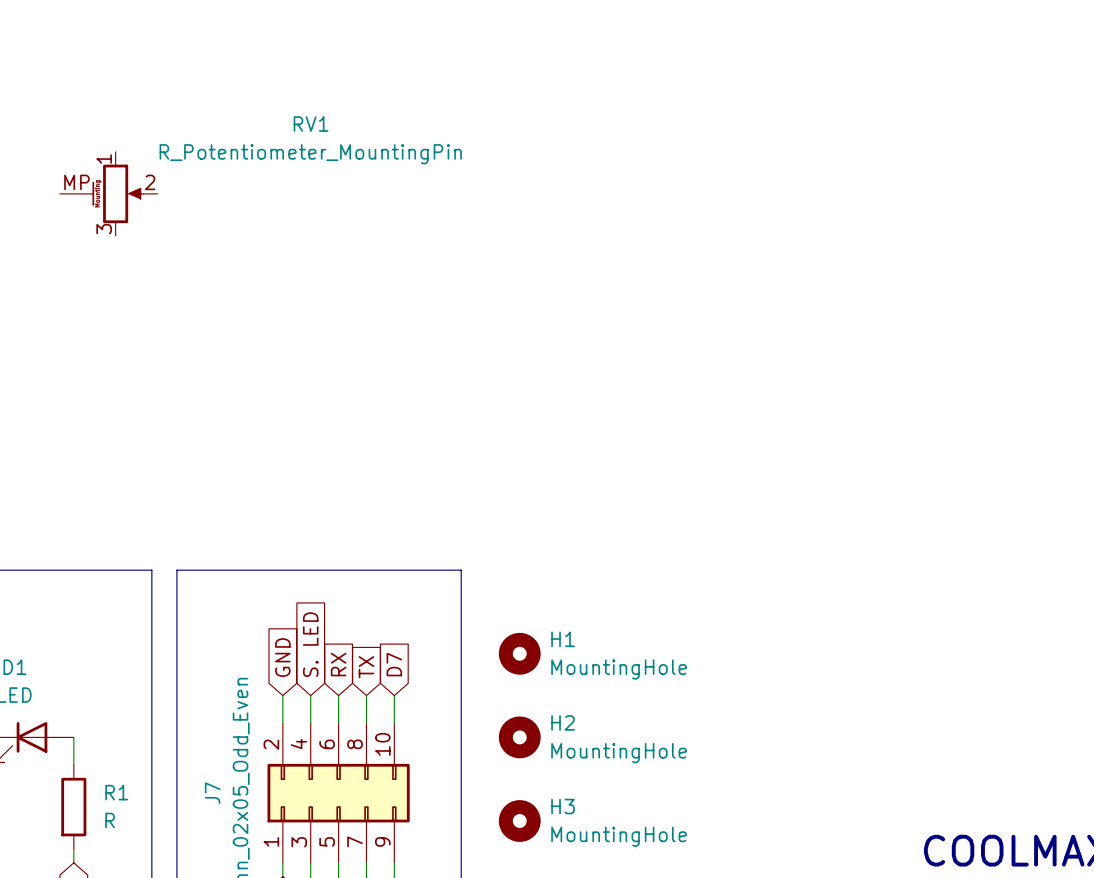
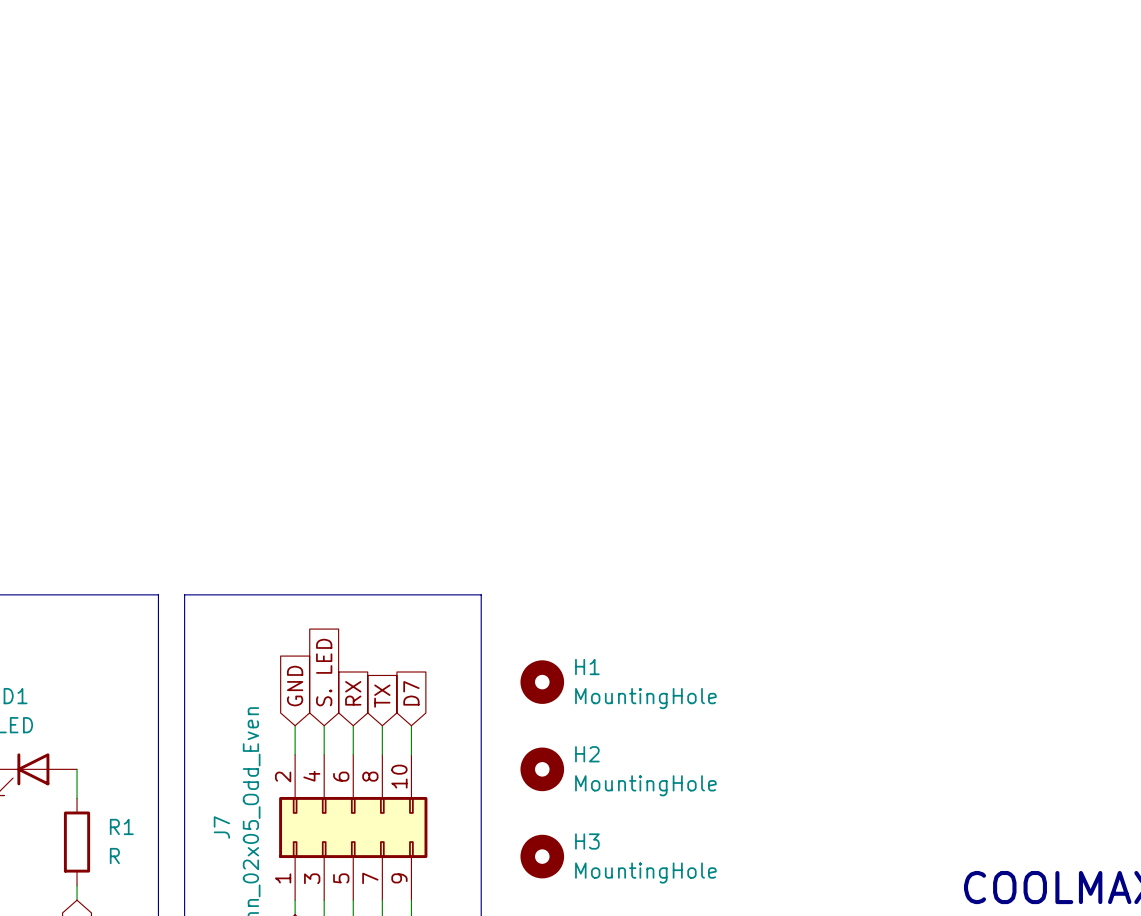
RV1: R_Potentiometer_MountingPin (108, 193) -> none

